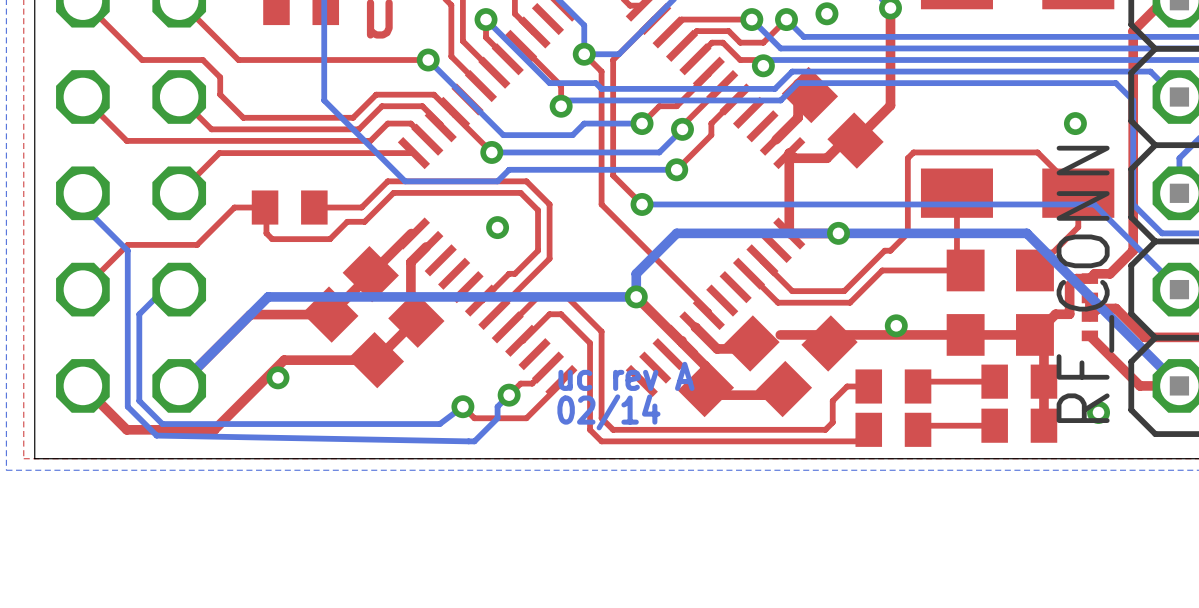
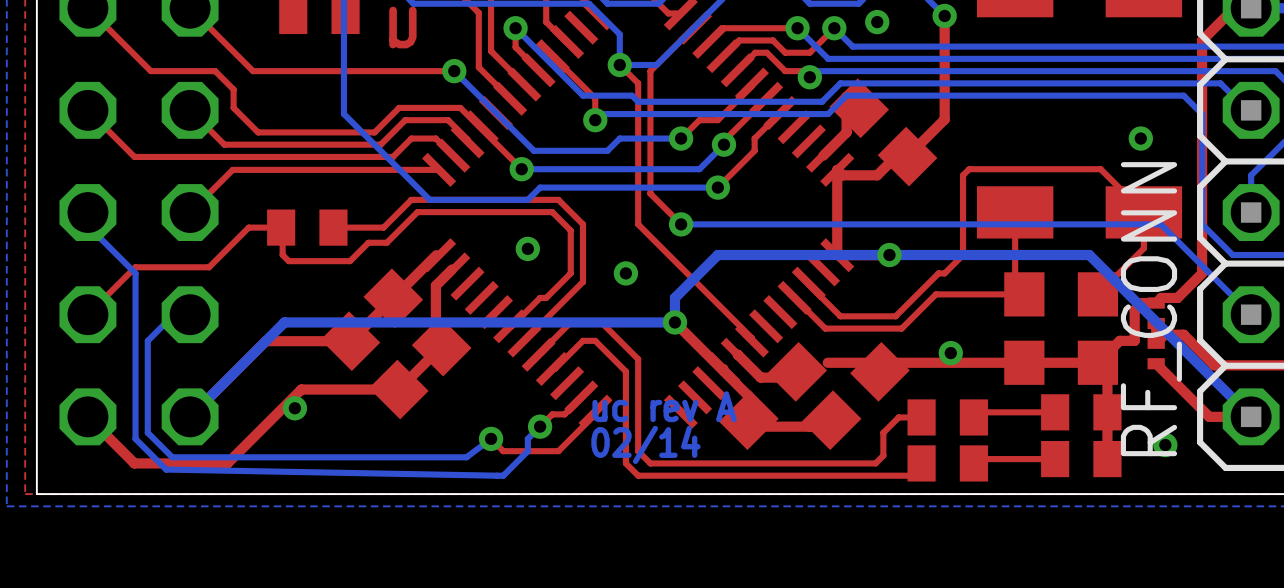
via: none -> (625, 273)

